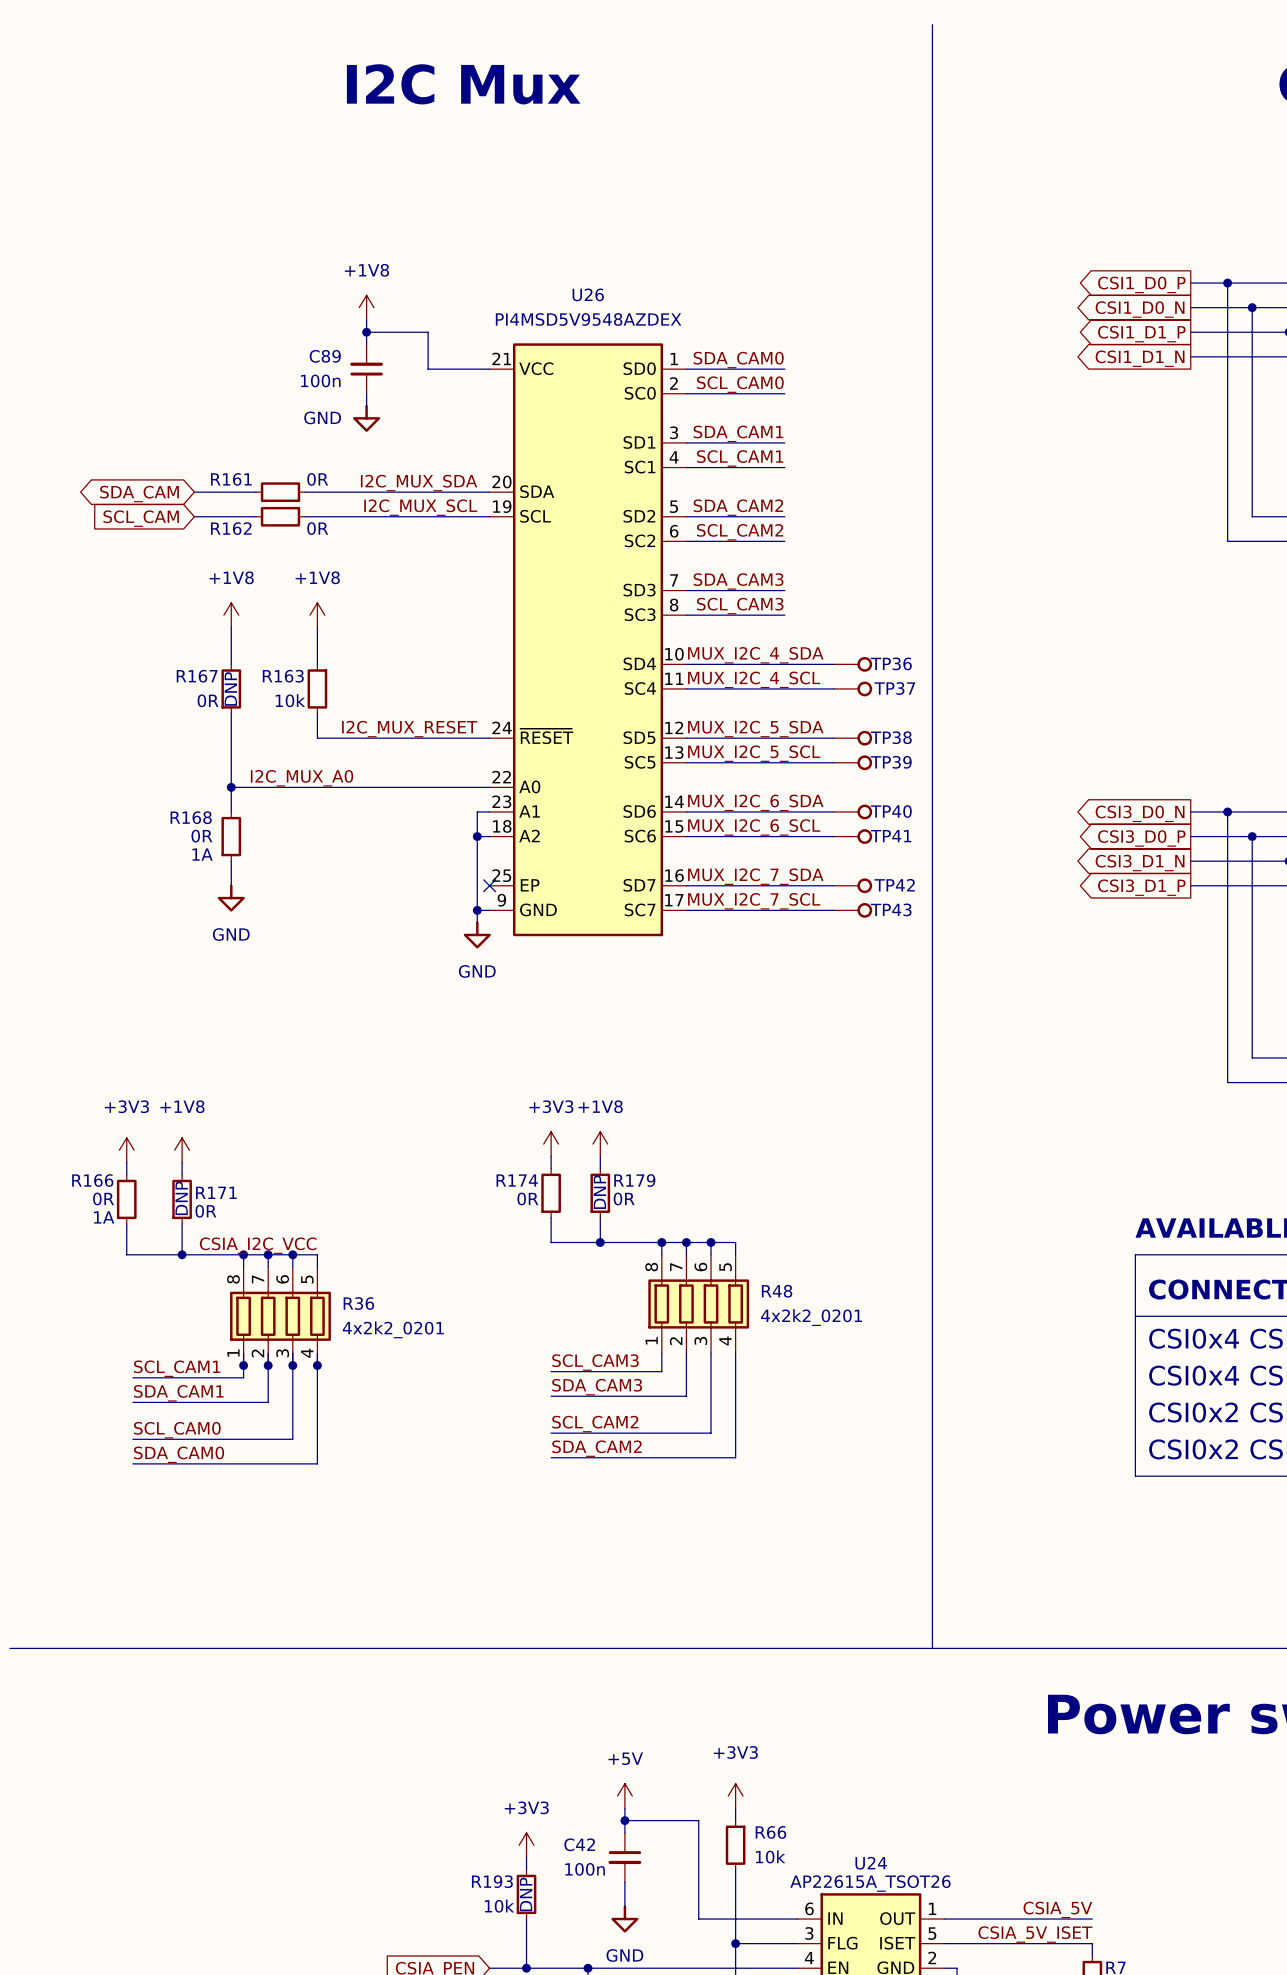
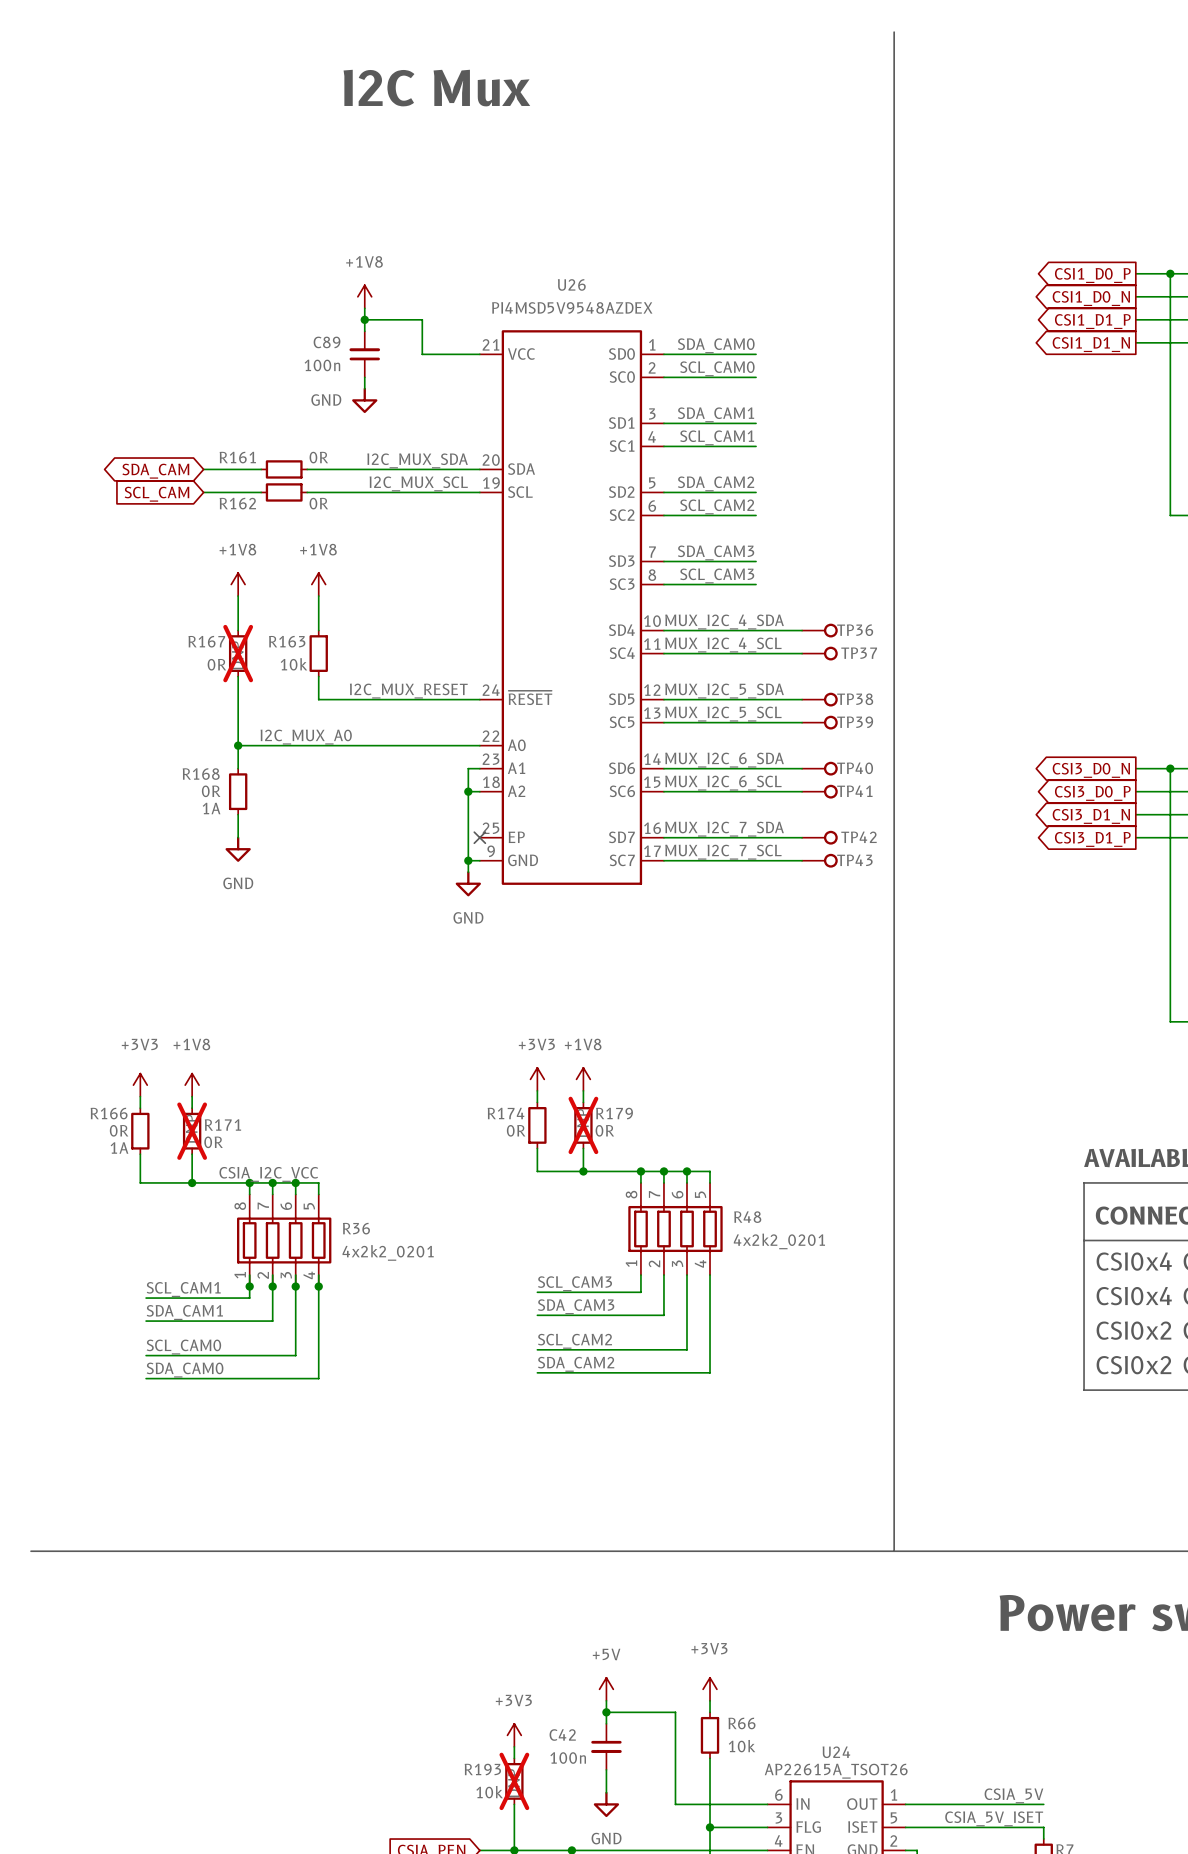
R167 do-not-place cross: none -> (238, 653)
R179 do-not-place cross: none -> (583, 1125)
R171 do-not-place cross: none -> (192, 1131)
R193 do-not-place cross: none -> (514, 1781)

